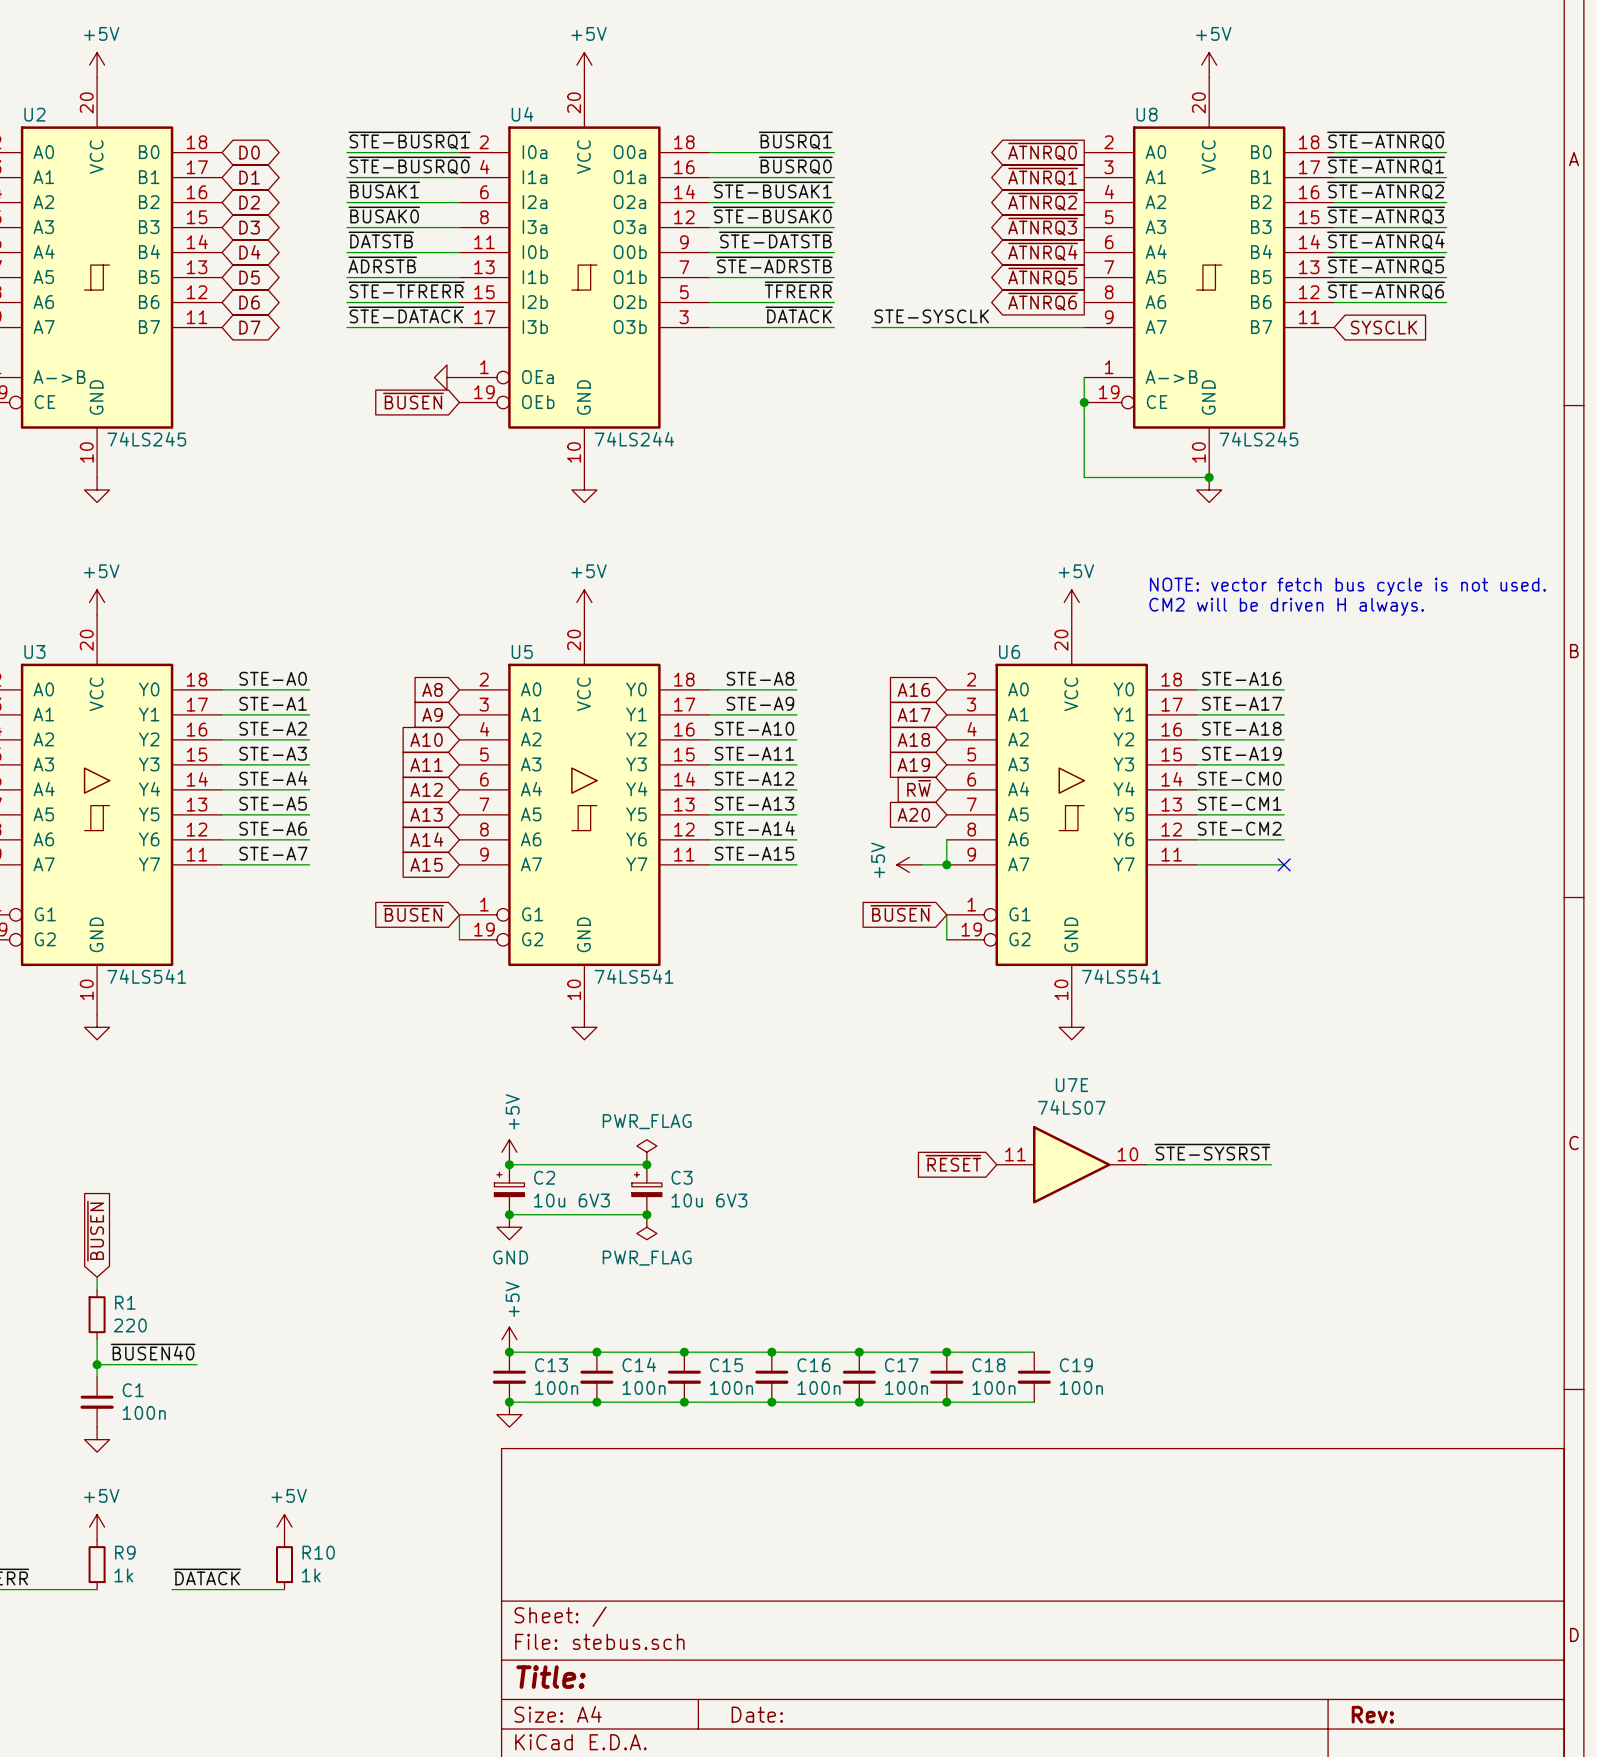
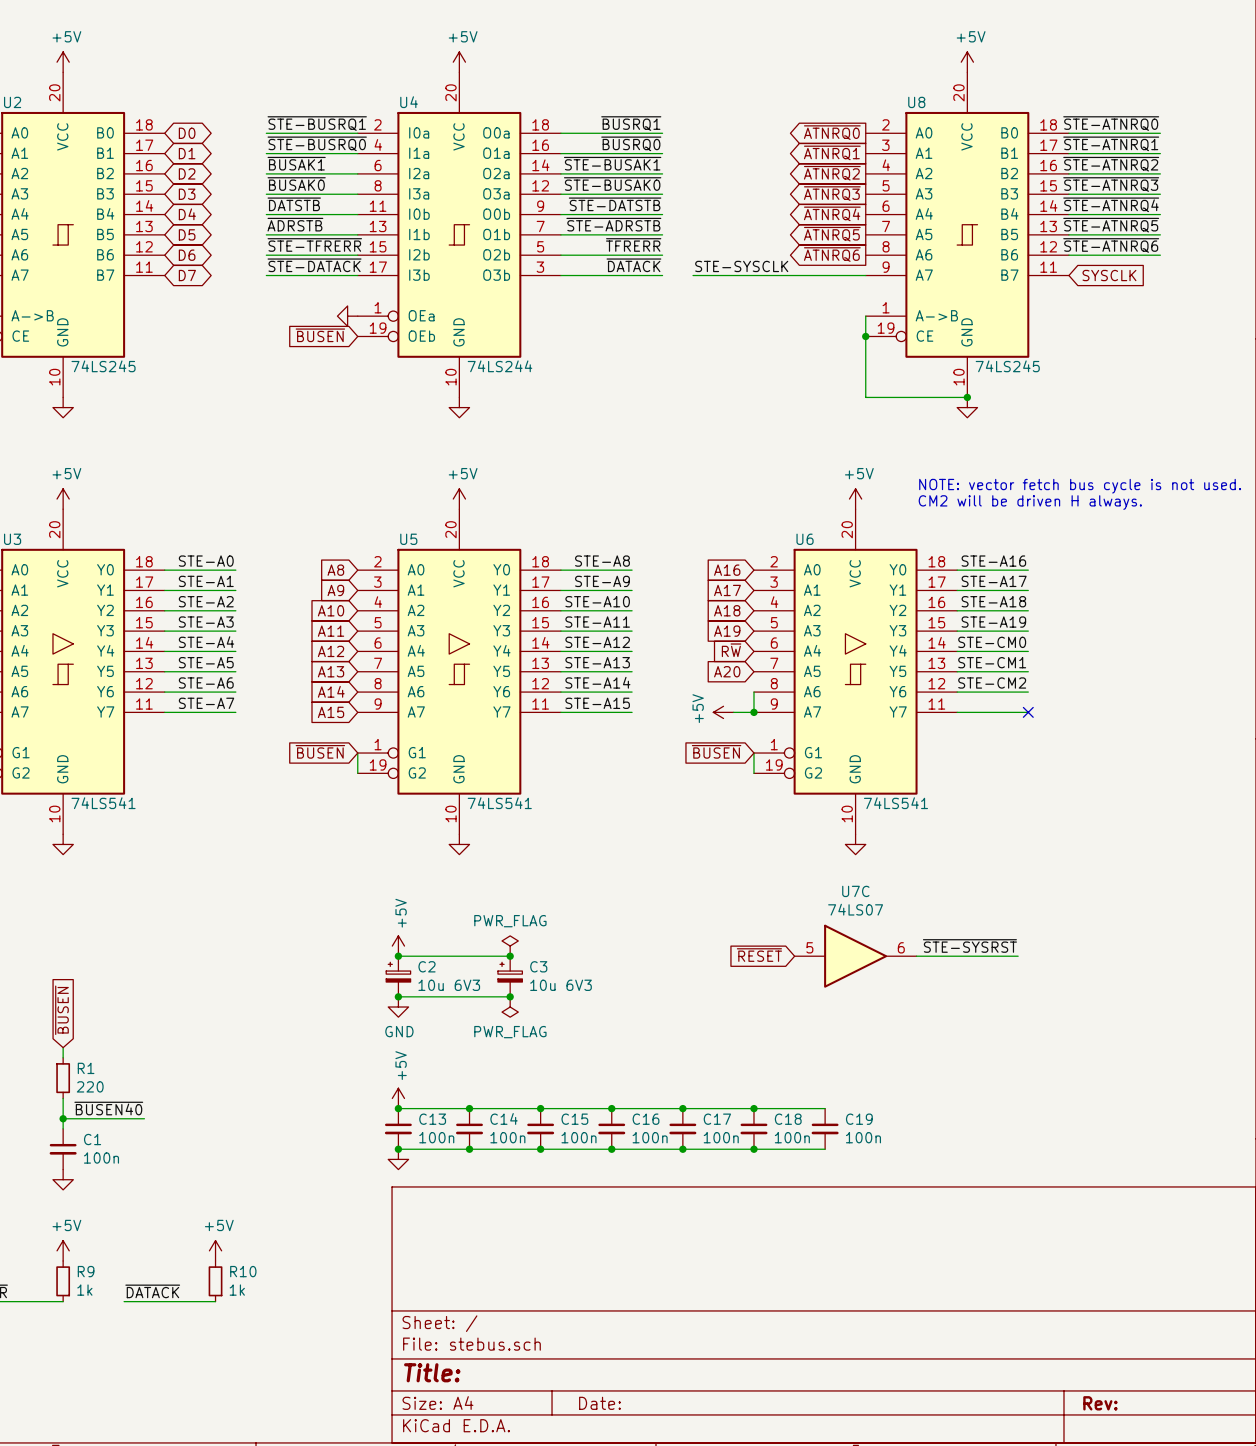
U7E name: U7E (1072, 1085) -> U7C (855, 891)
U7E pin number: 11 (1015, 1154) -> 5 (809, 947)
U7E pin number: 10 (1127, 1154) -> 6 (901, 947)

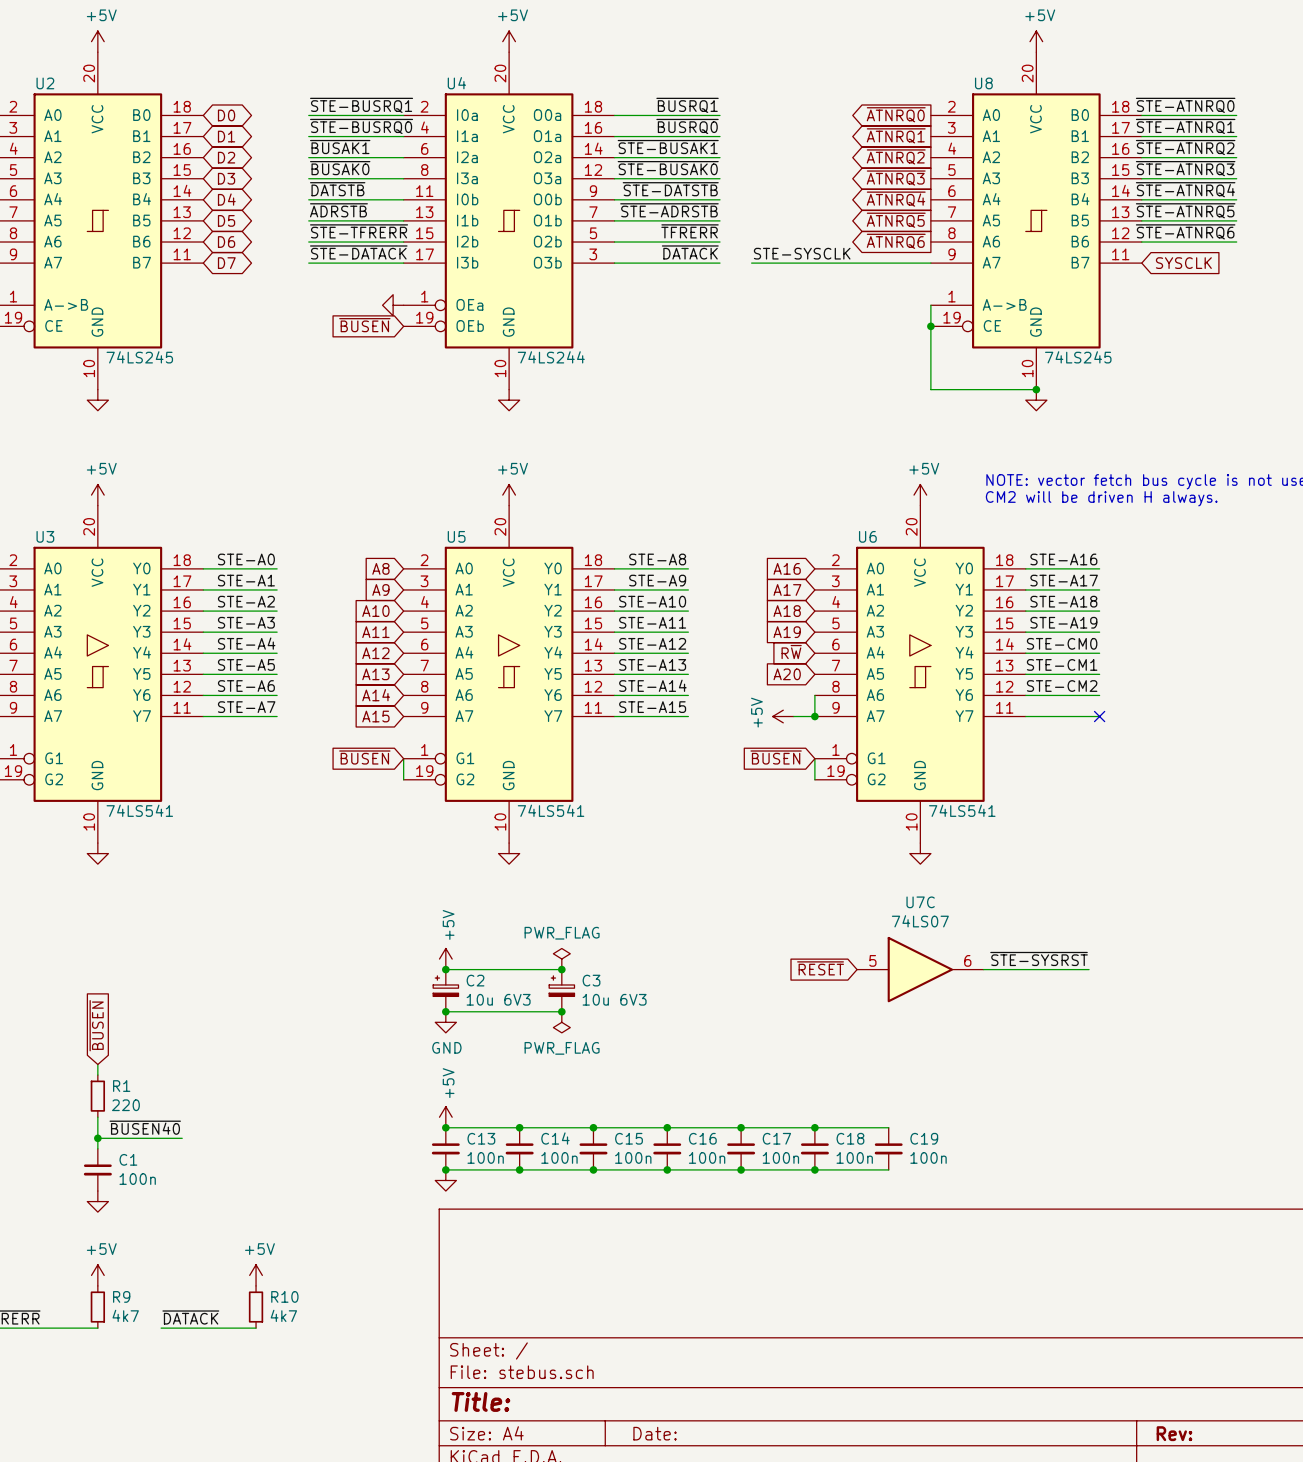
R9 value: 1k (84, 1290) -> 4k7 (125, 1315)
R10 value: 1k (237, 1290) -> 4k7 (283, 1315)

